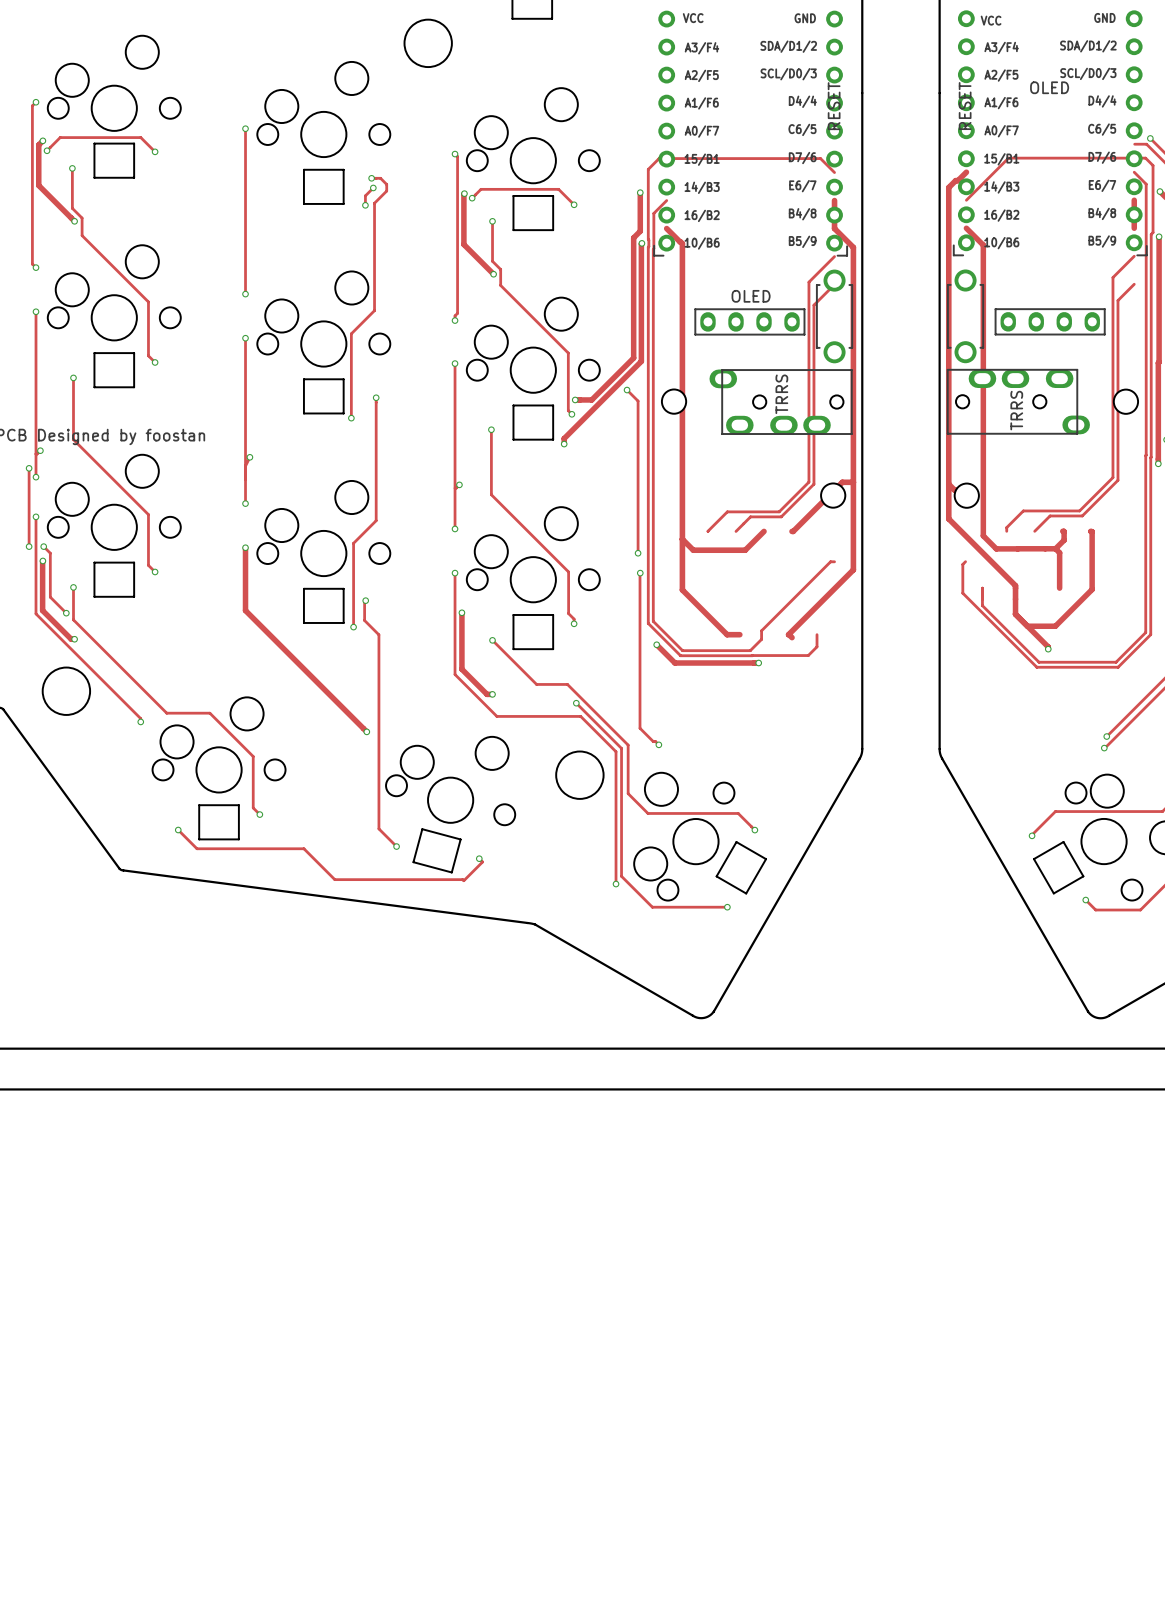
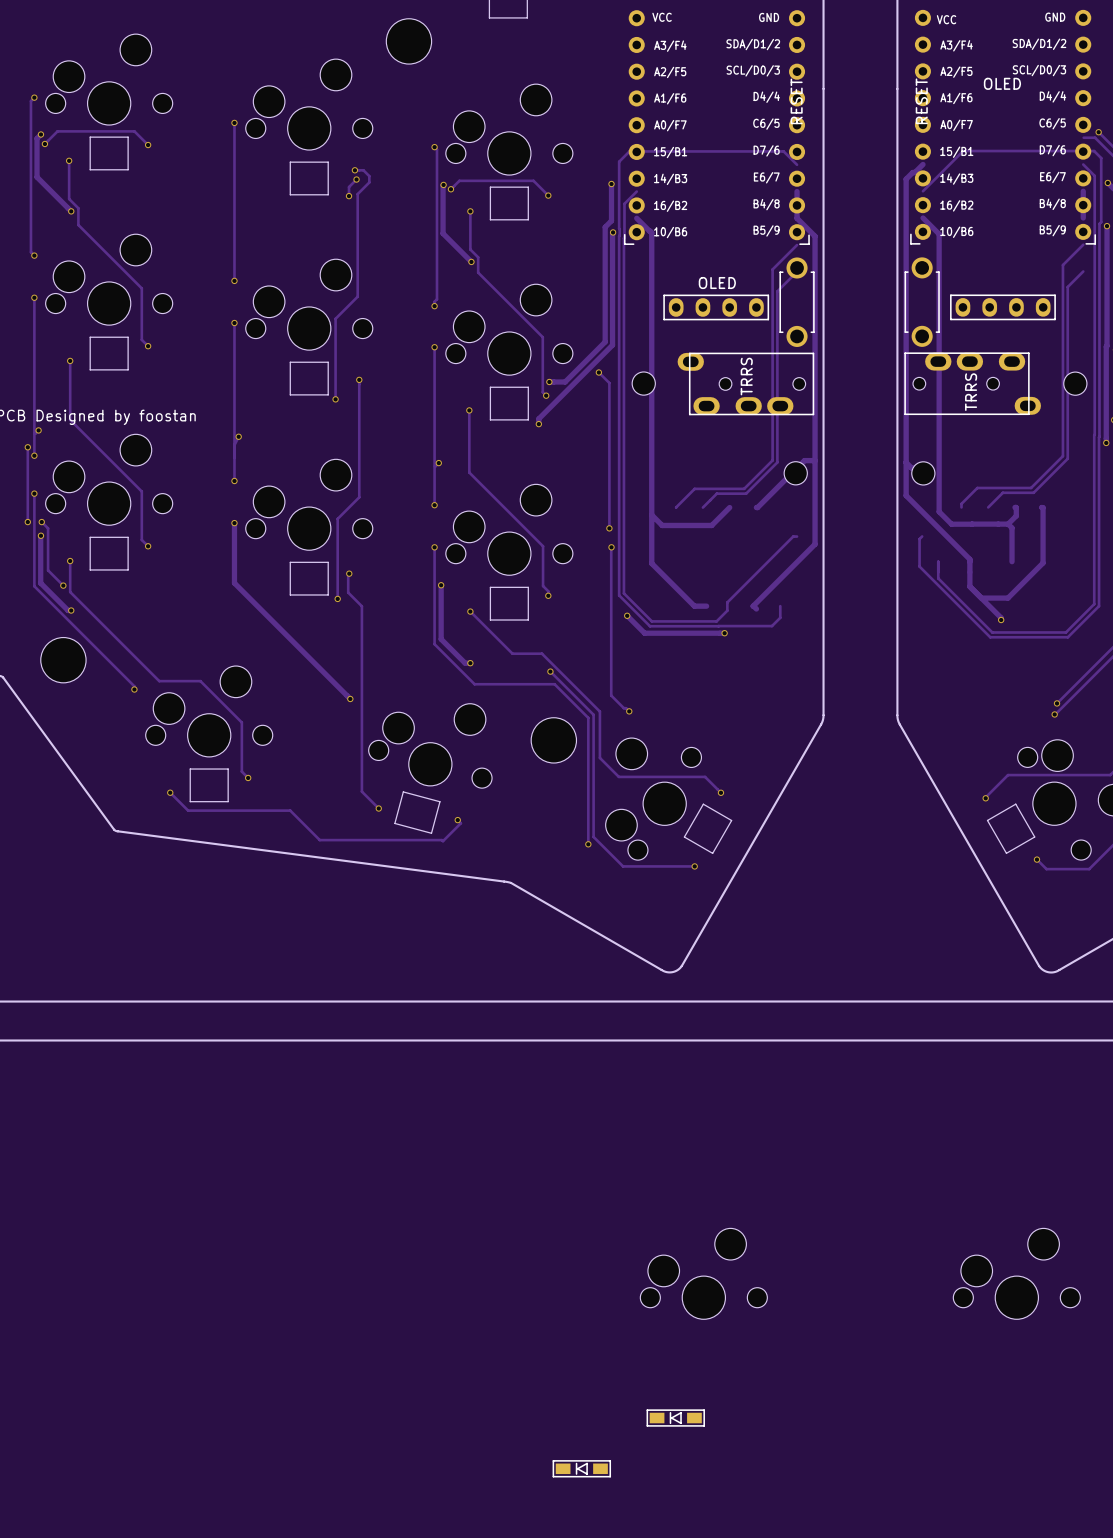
part: none -> (703, 1273)
part: none -> (1016, 1273)
part: none -> (675, 1418)
part: none -> (581, 1468)

